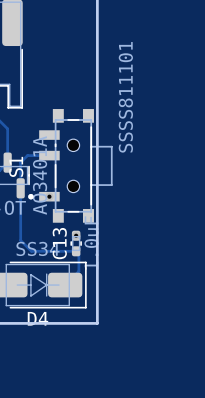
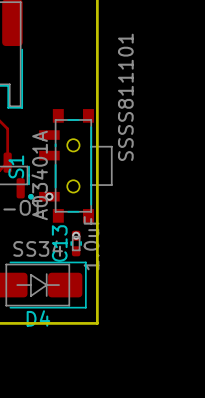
track: (49, 155) (27, 155) (20, 162) (20, 240) (31, 251) (76, 251) (78, 254) (78, 271) (65, 285) -> none

